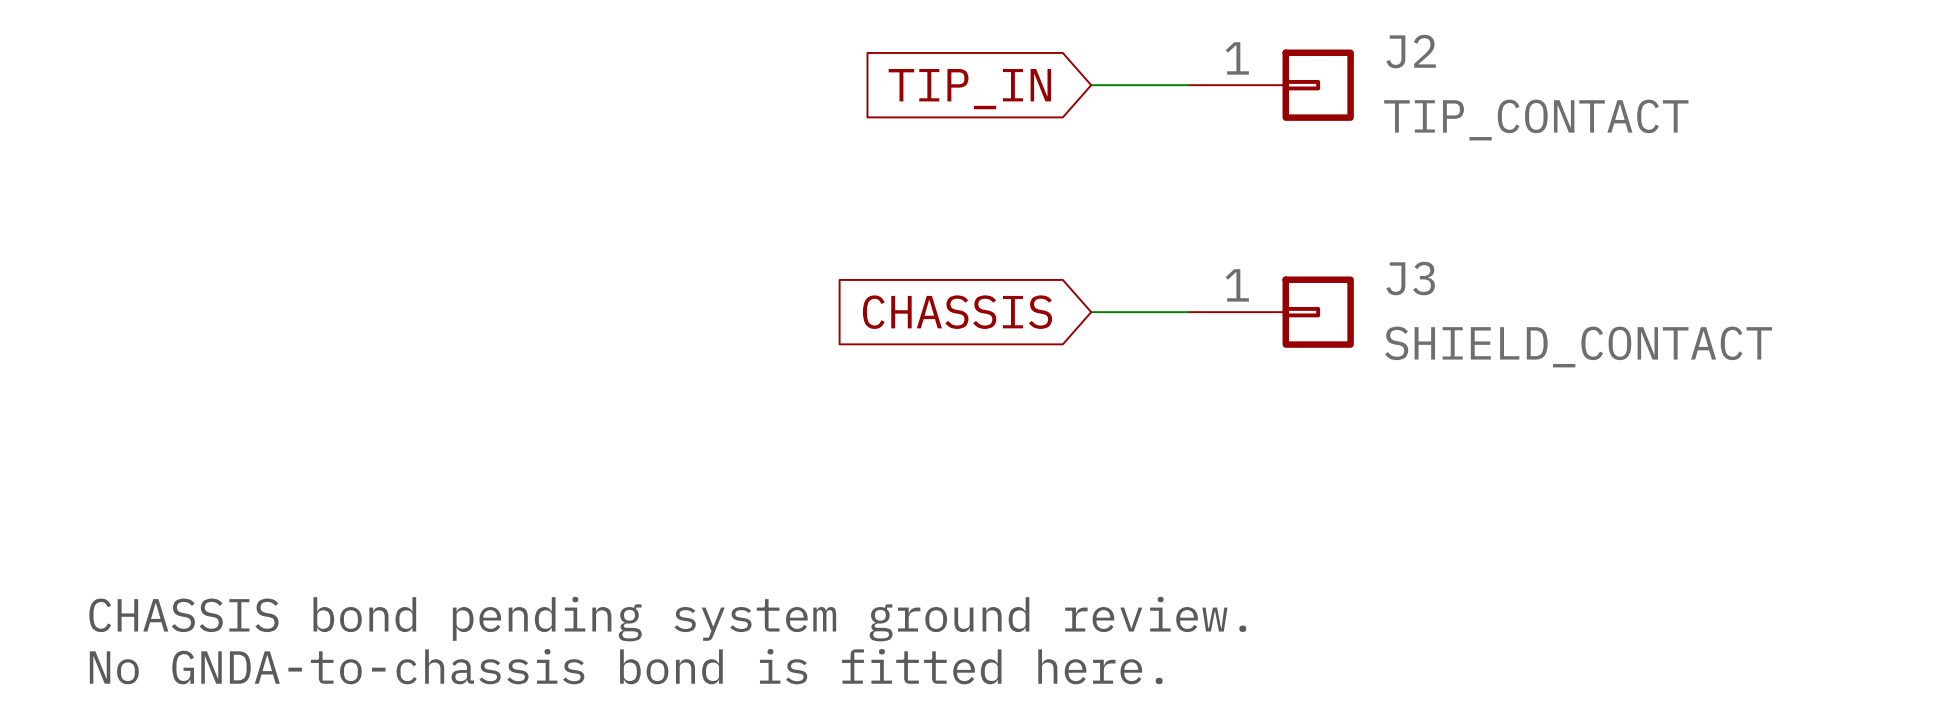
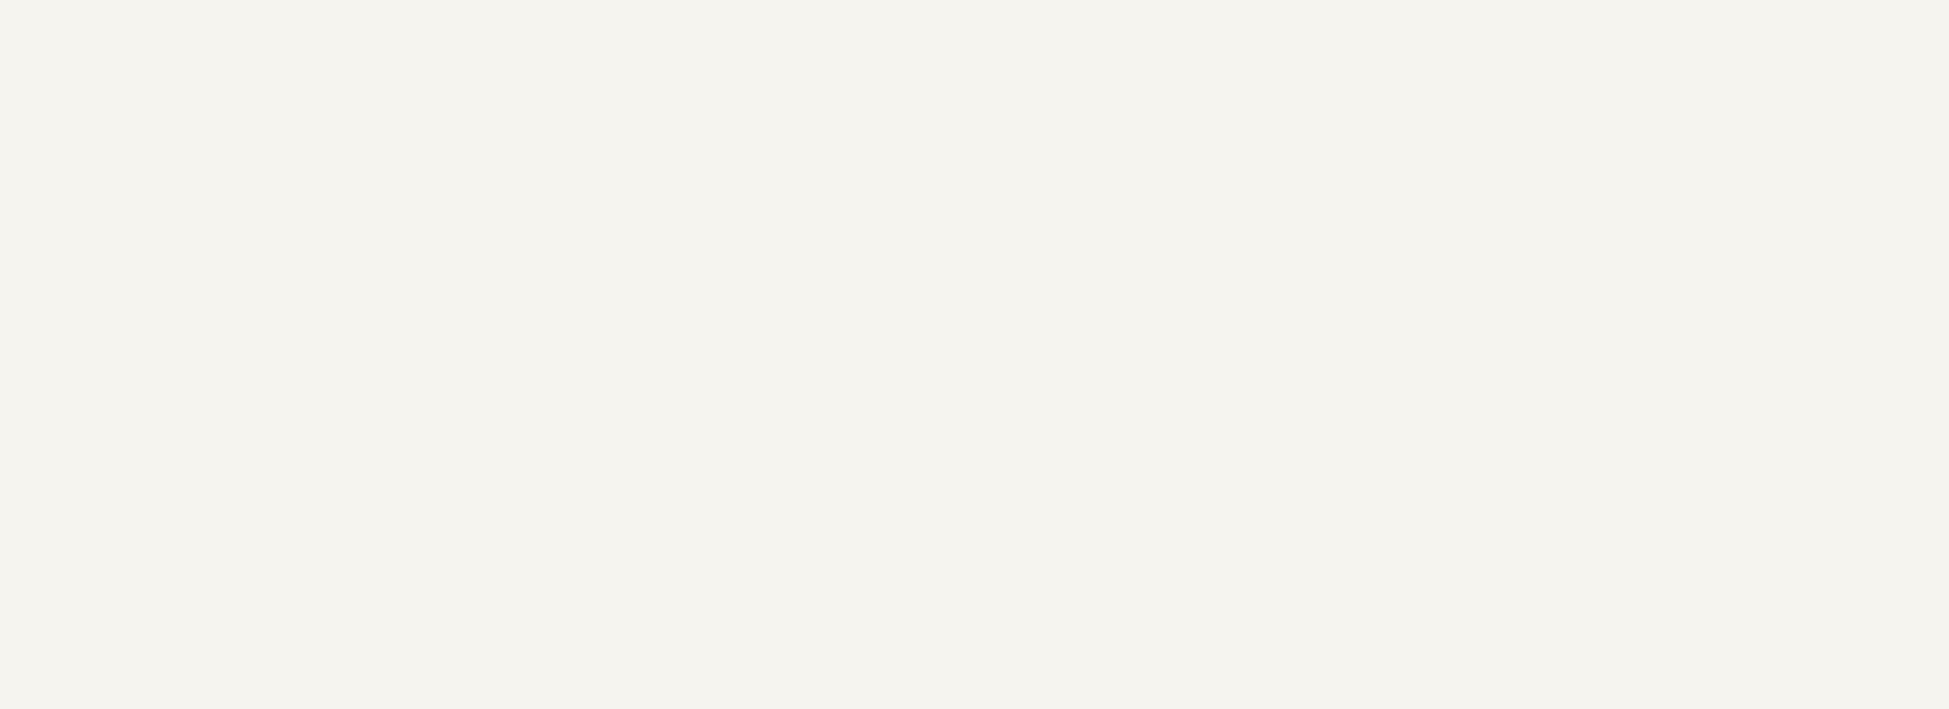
wire: (1091, 85) (1188, 85) -> none
J2: TIP_CONTACT (1271, 85) -> none
global label: TIP_IN (969, 89) -> none
global label: CHASSIS (957, 312) -> none
wire: (1091, 312) (1188, 312) -> none
J3: SHIELD_CONTACT (1271, 312) -> none
text: CHASSIS bond pending system ground review. (667, 619) -> none
text: No GNDA-to-chassis bond is fitted here. (626, 666) -> none

